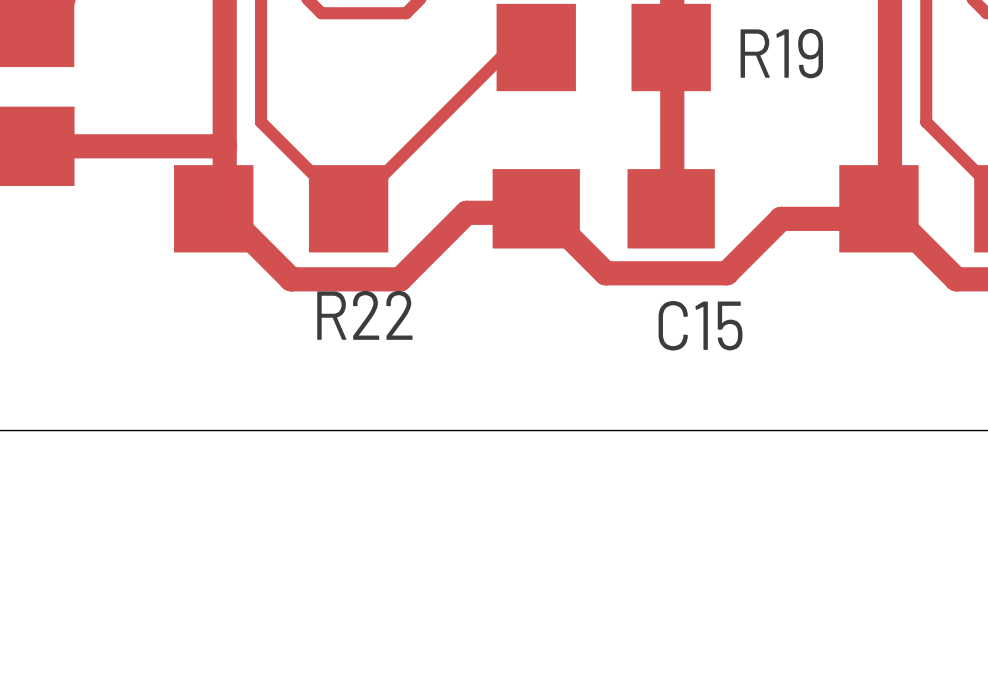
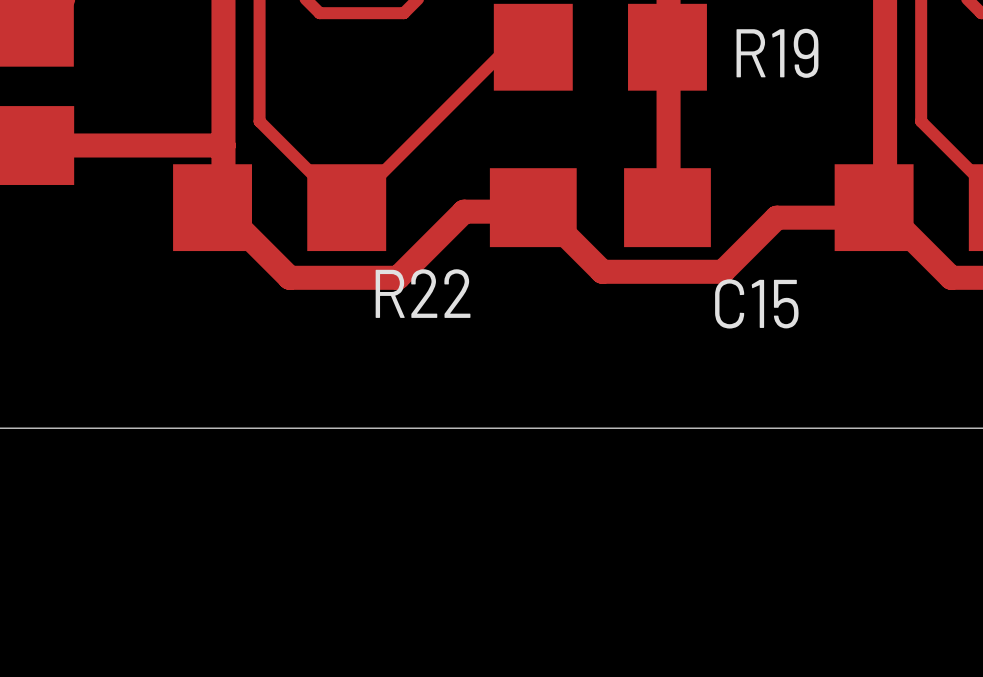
R22 name position: R22 (364, 315) -> R22 (423, 293)
C15 name position: C15 (700, 325) -> C15 (756, 303)

